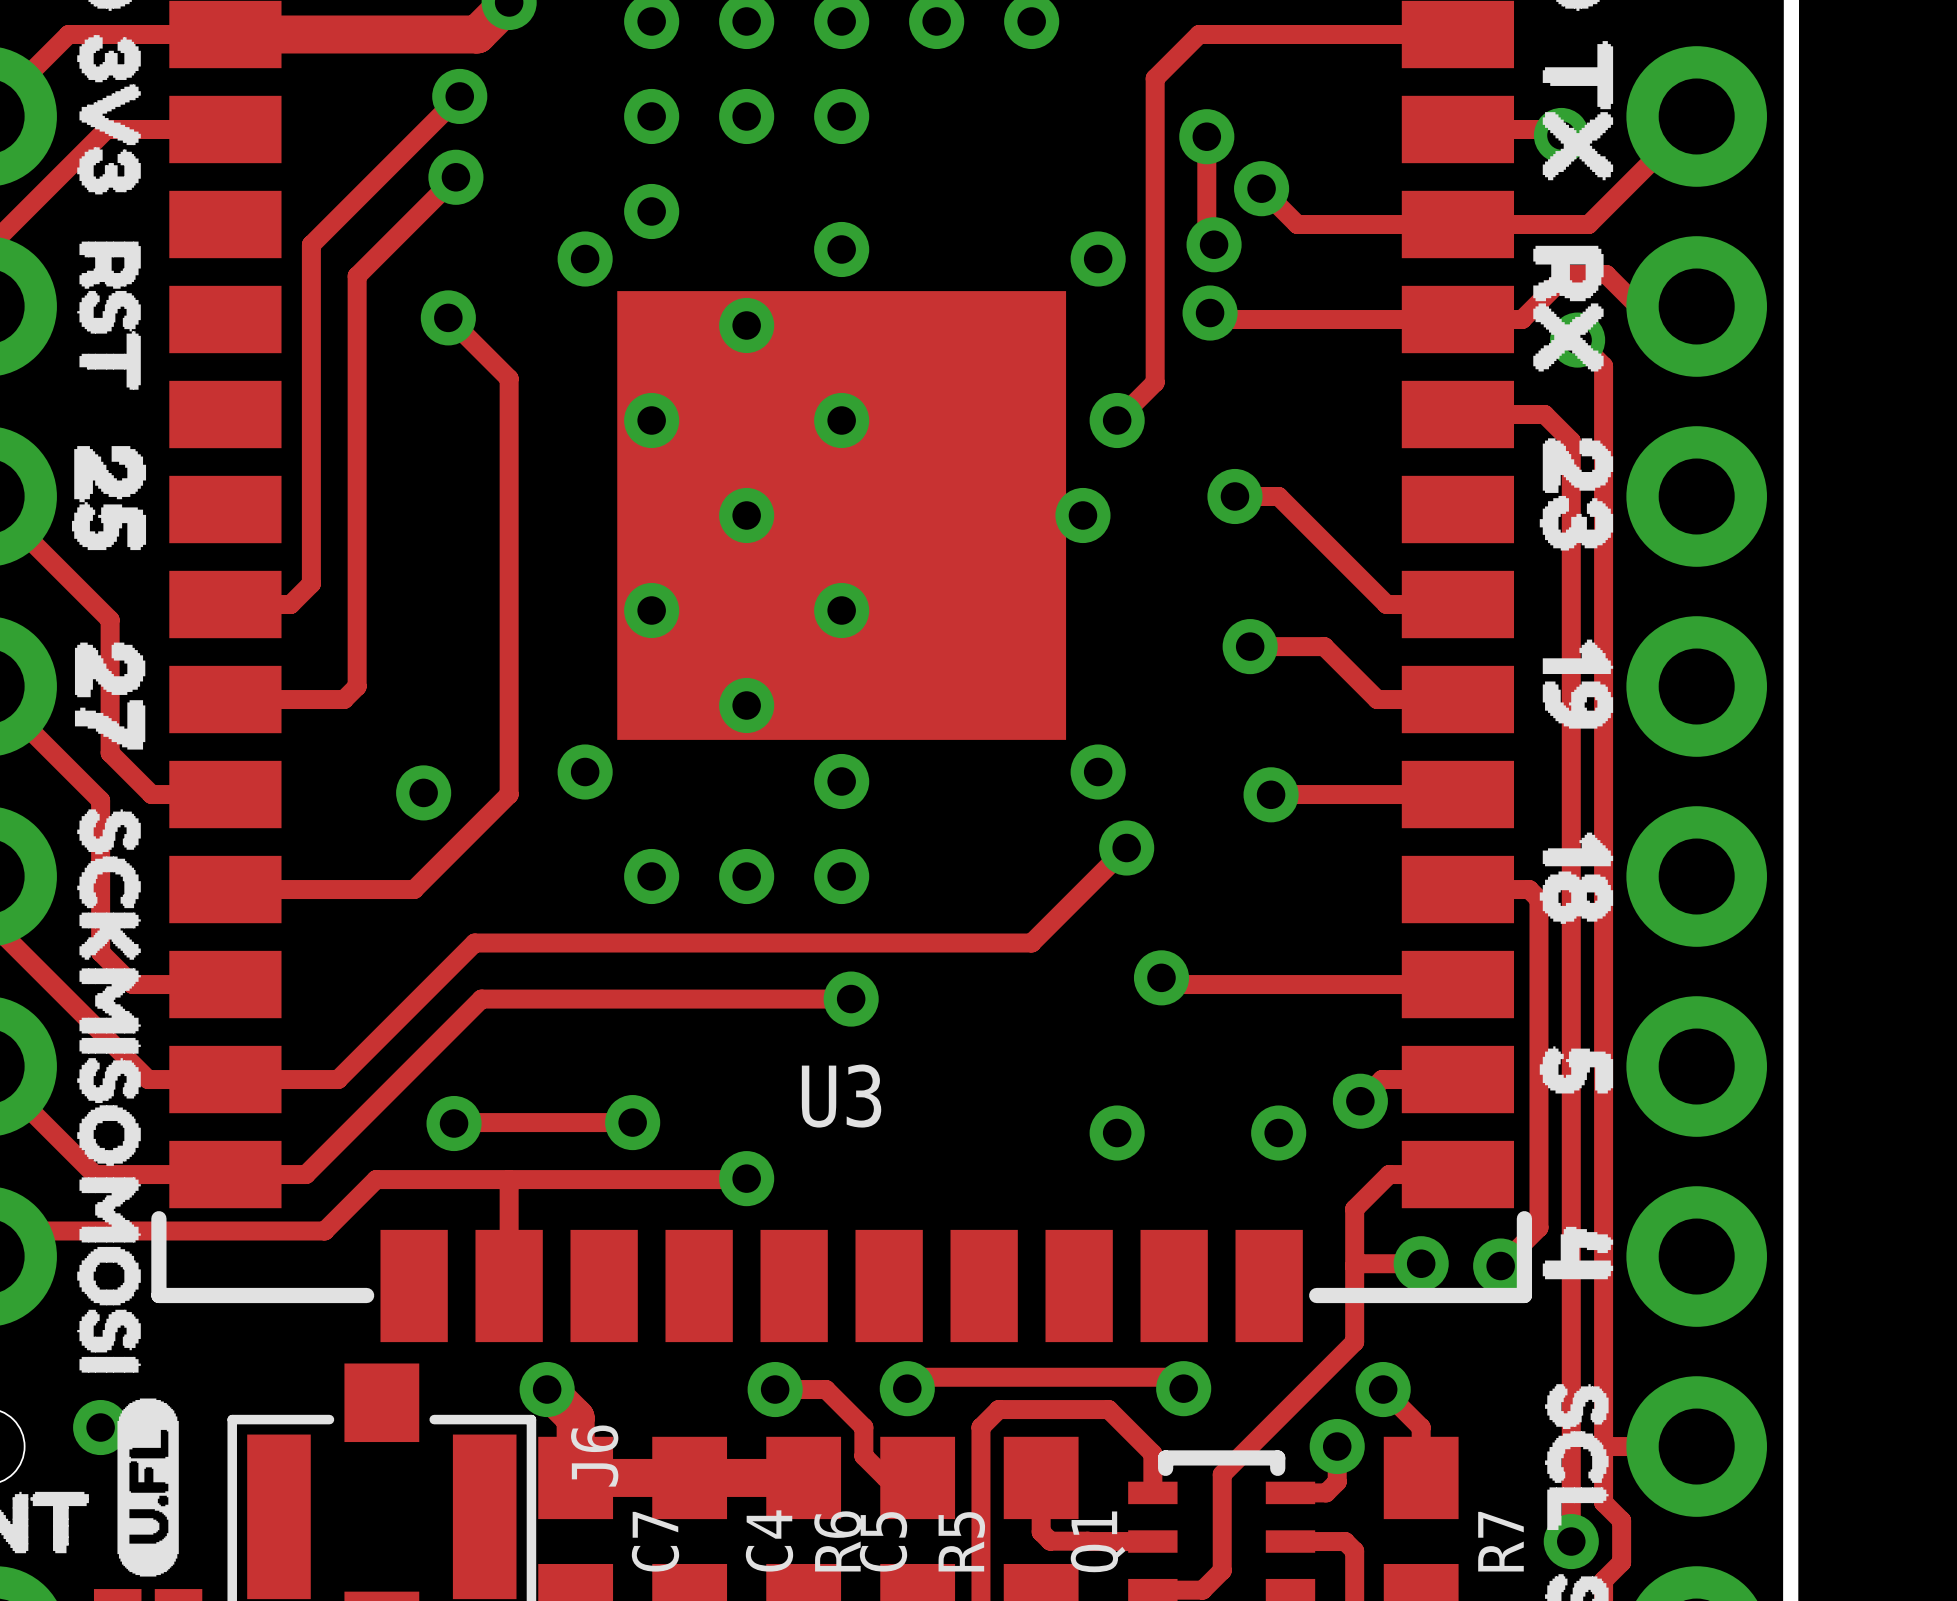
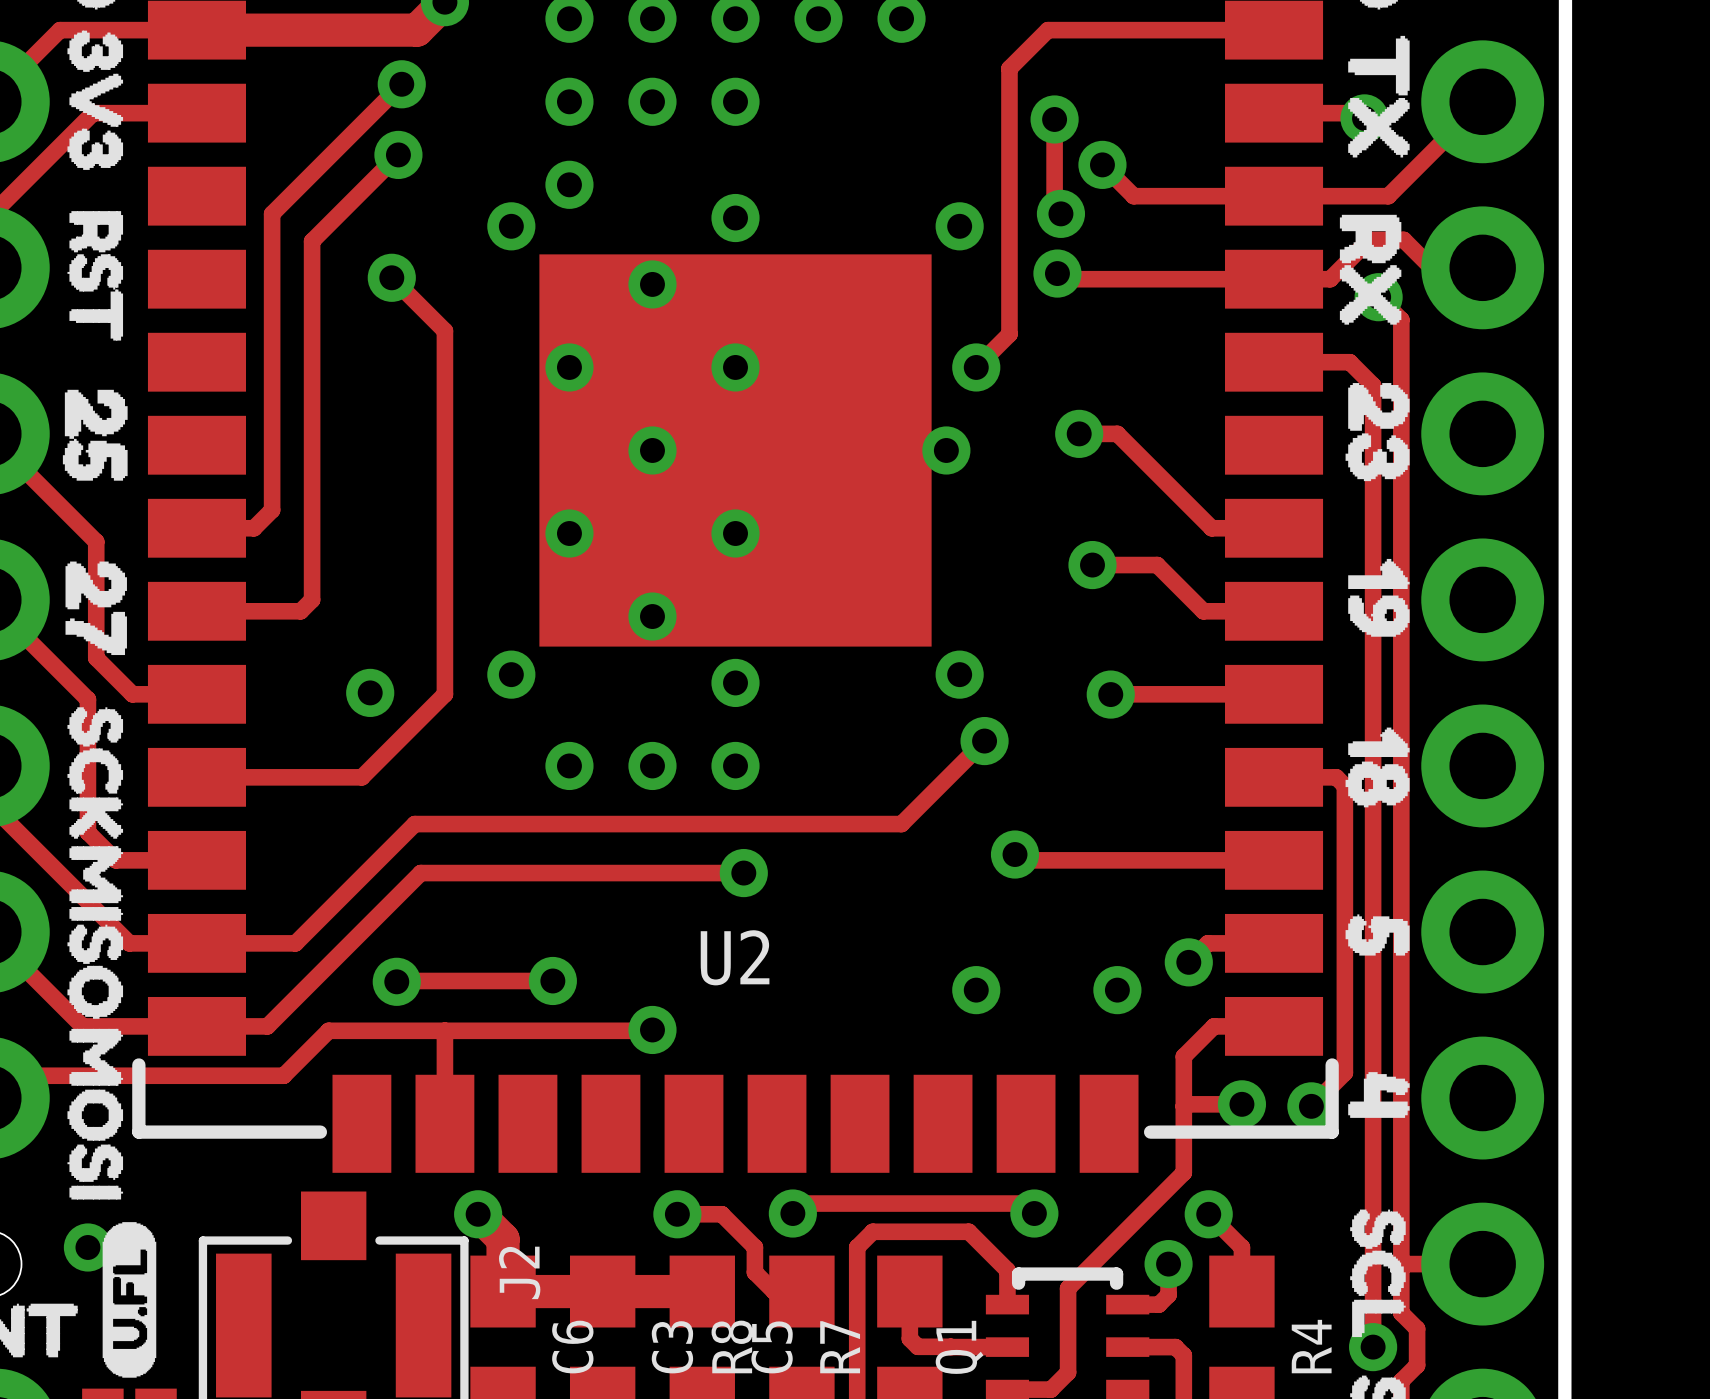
U3 name: U3 (841, 1096) -> U2 (735, 957)
J6 name: J6 (594, 1456) -> J2 (519, 1272)
C4 name: C4 (769, 1540) -> C3 (672, 1347)
C7 name: C7 (655, 1541) -> C6 (572, 1347)
R6 name: R6 (837, 1541) -> R8 (732, 1346)
R5 name: R5 (961, 1541) -> R7 (840, 1347)
R7 name: R7 (1500, 1541) -> R4 (1311, 1346)

